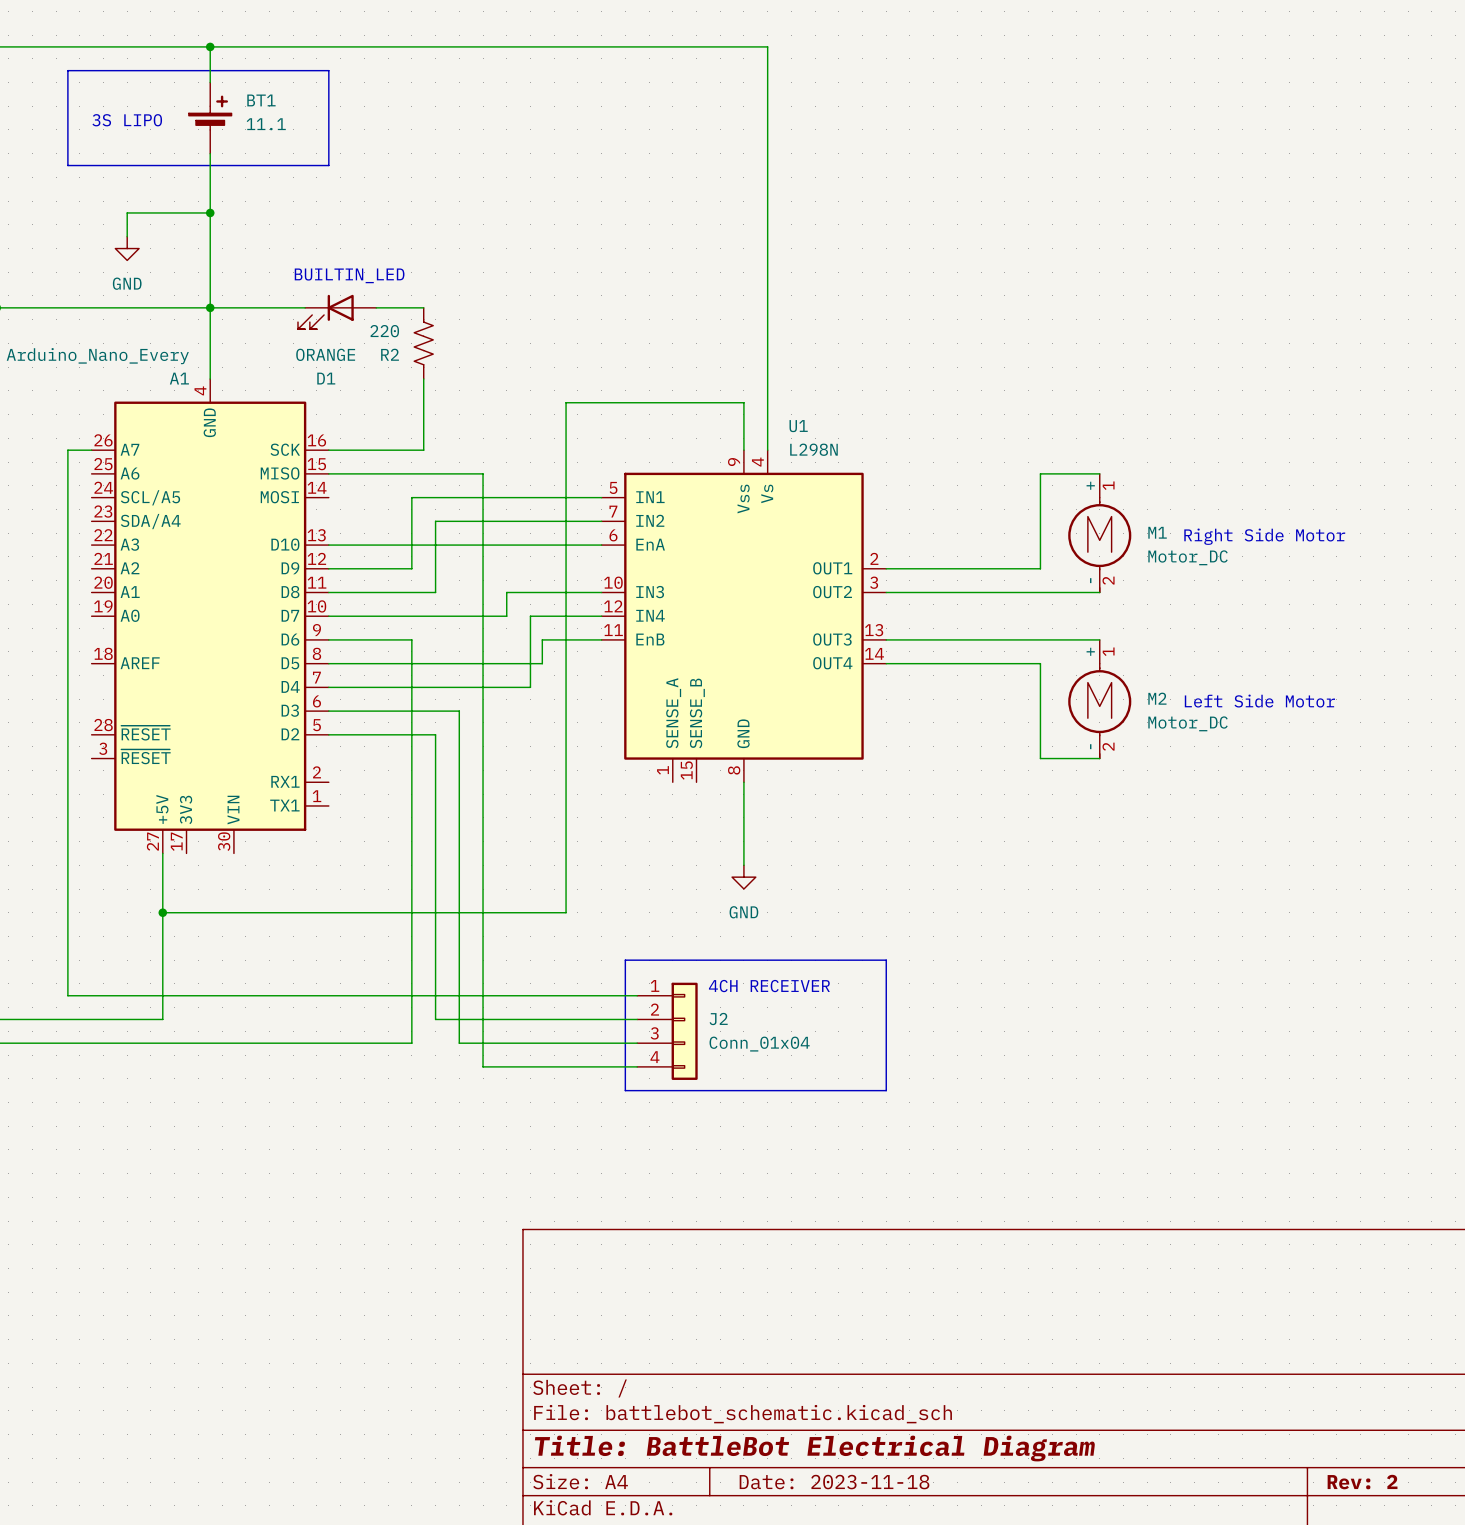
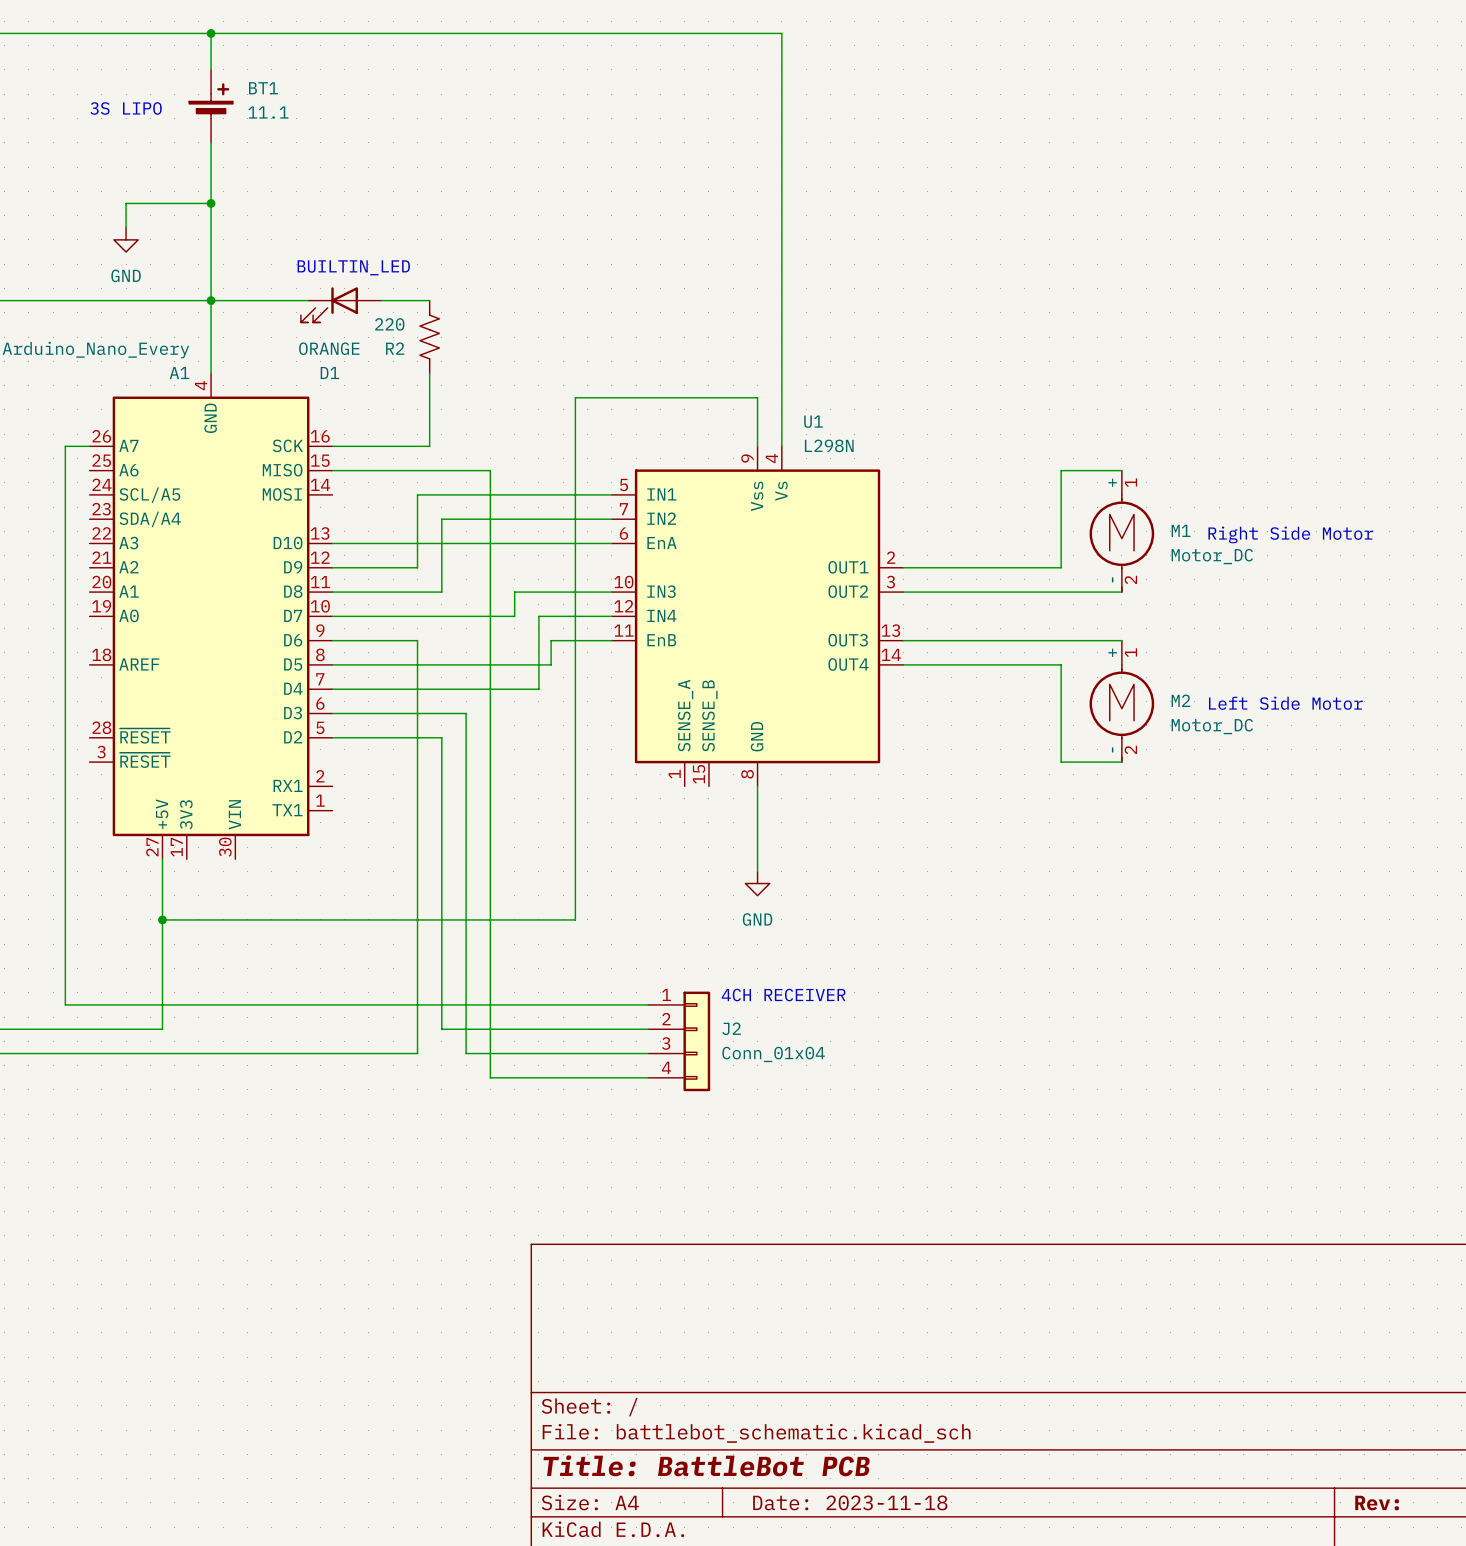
line: (67, 70) (328, 70) (328, 165) (67, 165) (67, 70) -> none
line: (625, 960) (886, 960) (886, 1090) (625, 1090) (625, 960) -> none
title block: Title: BattleBot Electrical Diagram (815, 1448) -> Title: BattleBot PCB (706, 1465)
title block: Rev: 2 (1362, 1482) -> Rev: (1377, 1503)

